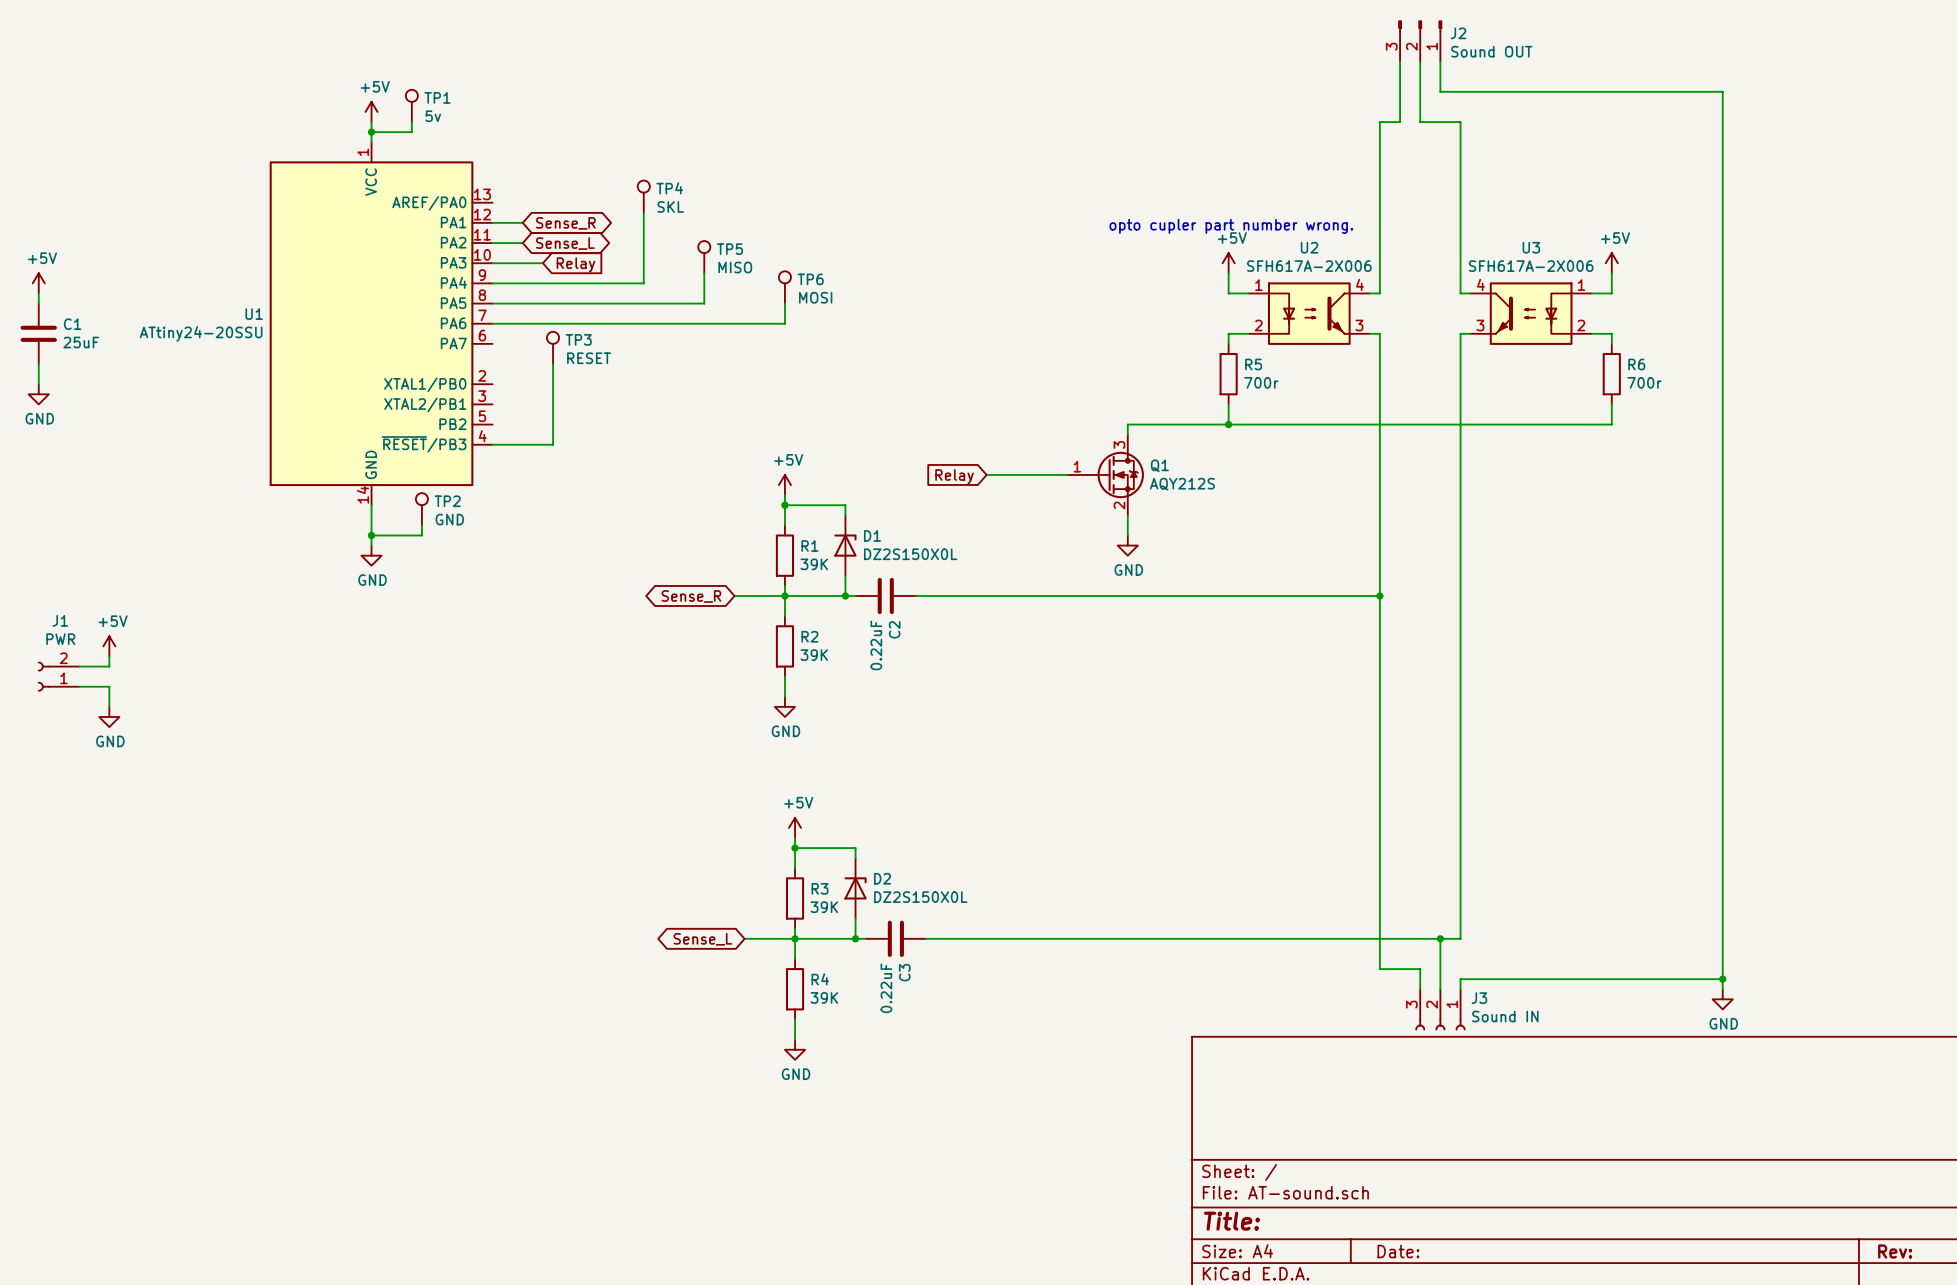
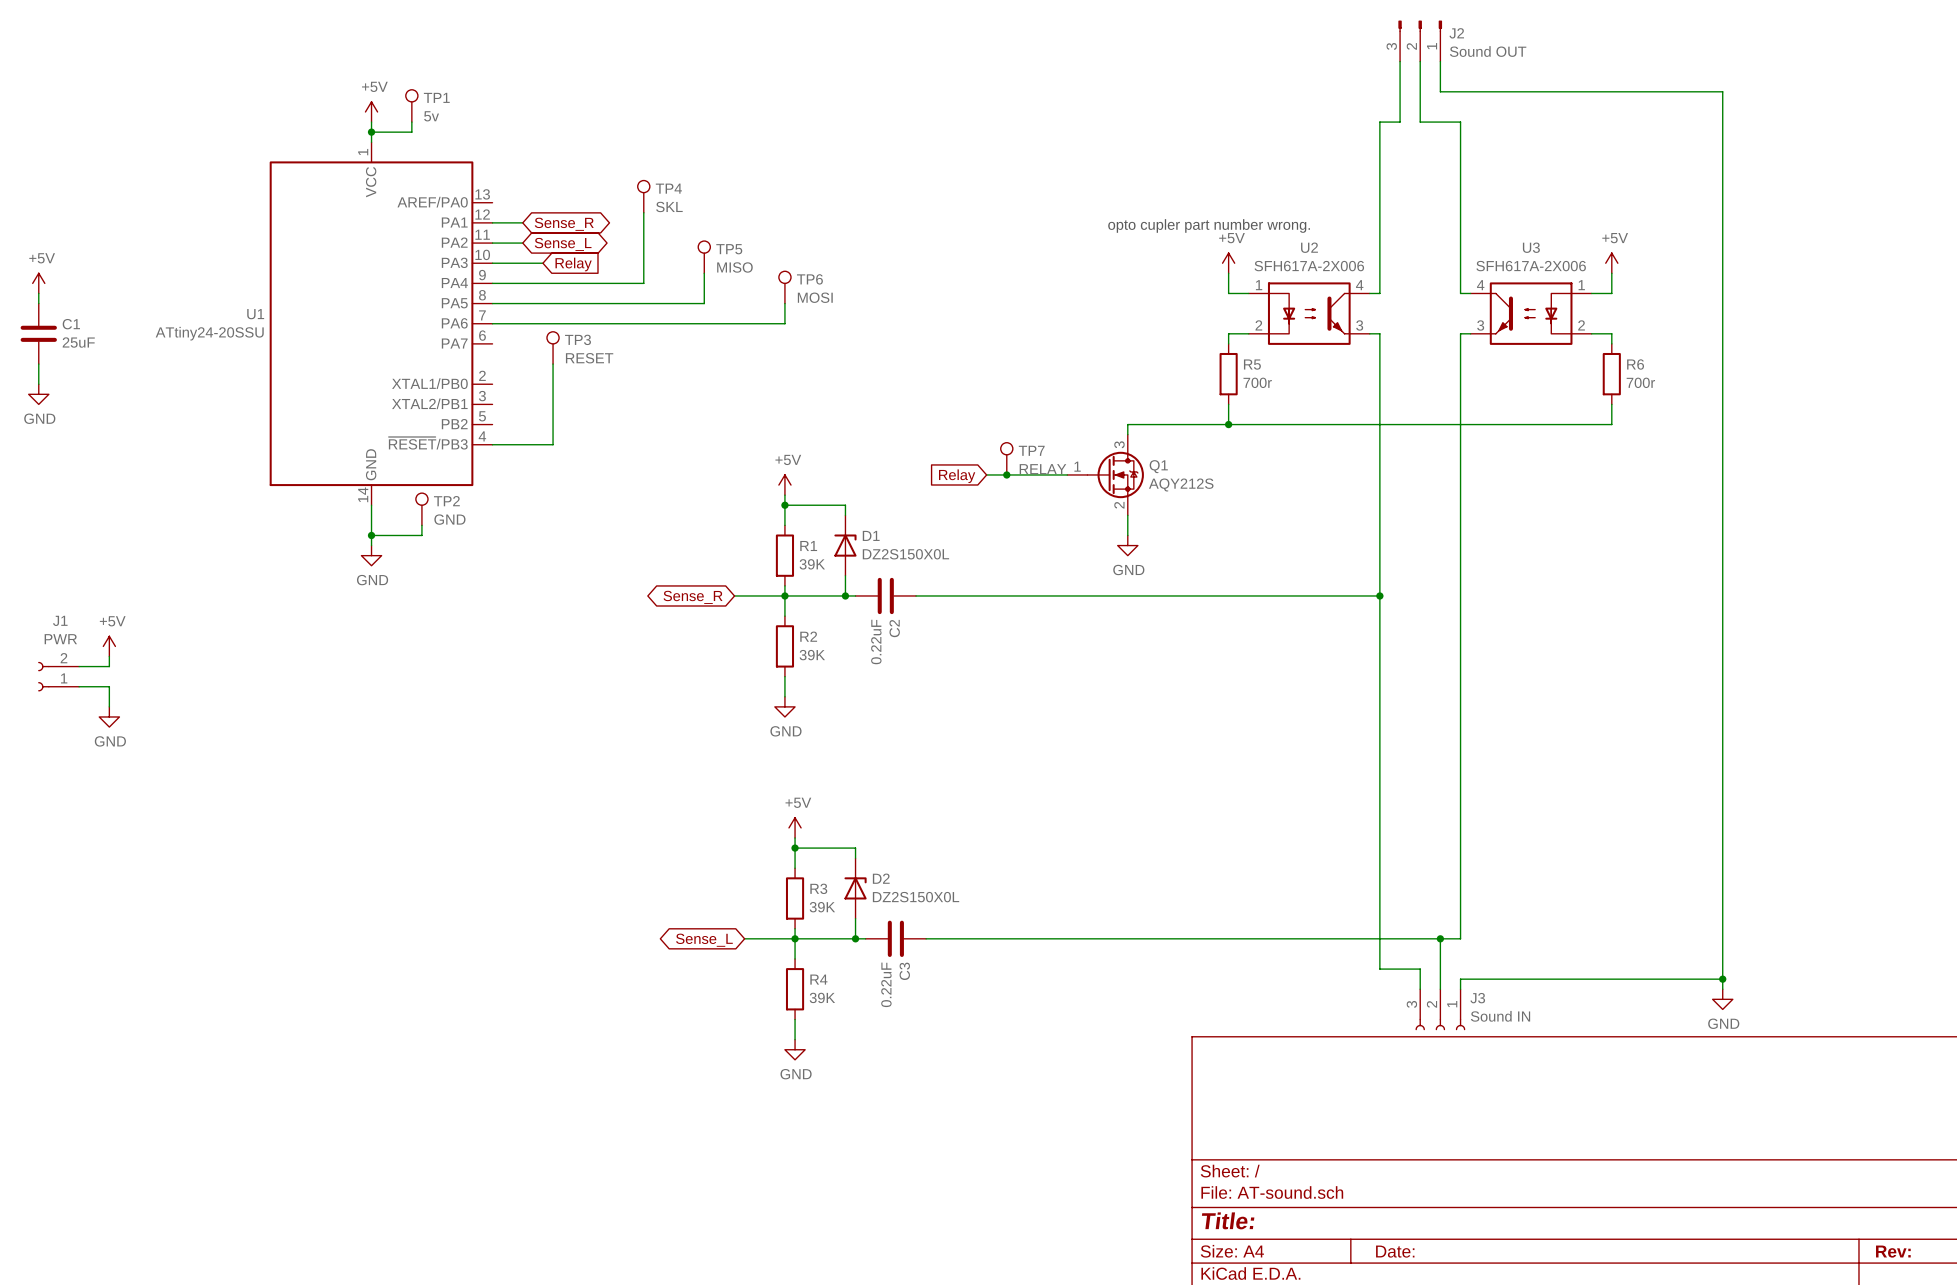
TP7: none -> RELAY (1006, 458)
junction: none -> (1006, 474)

